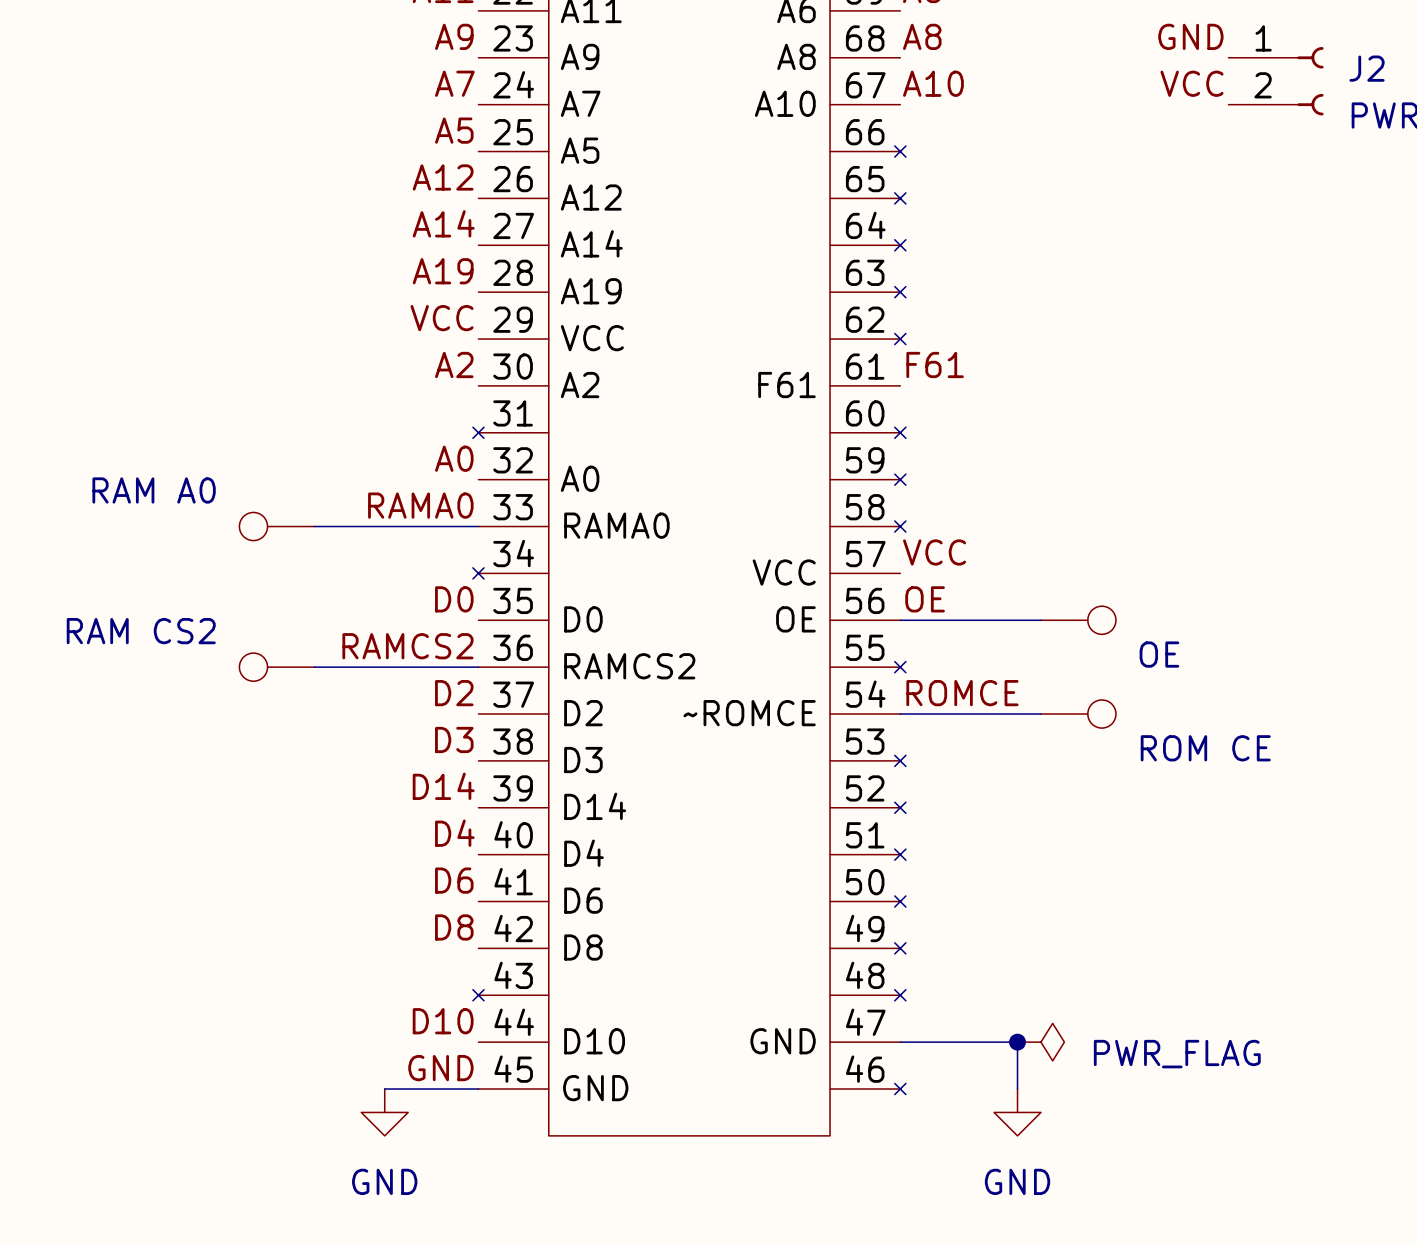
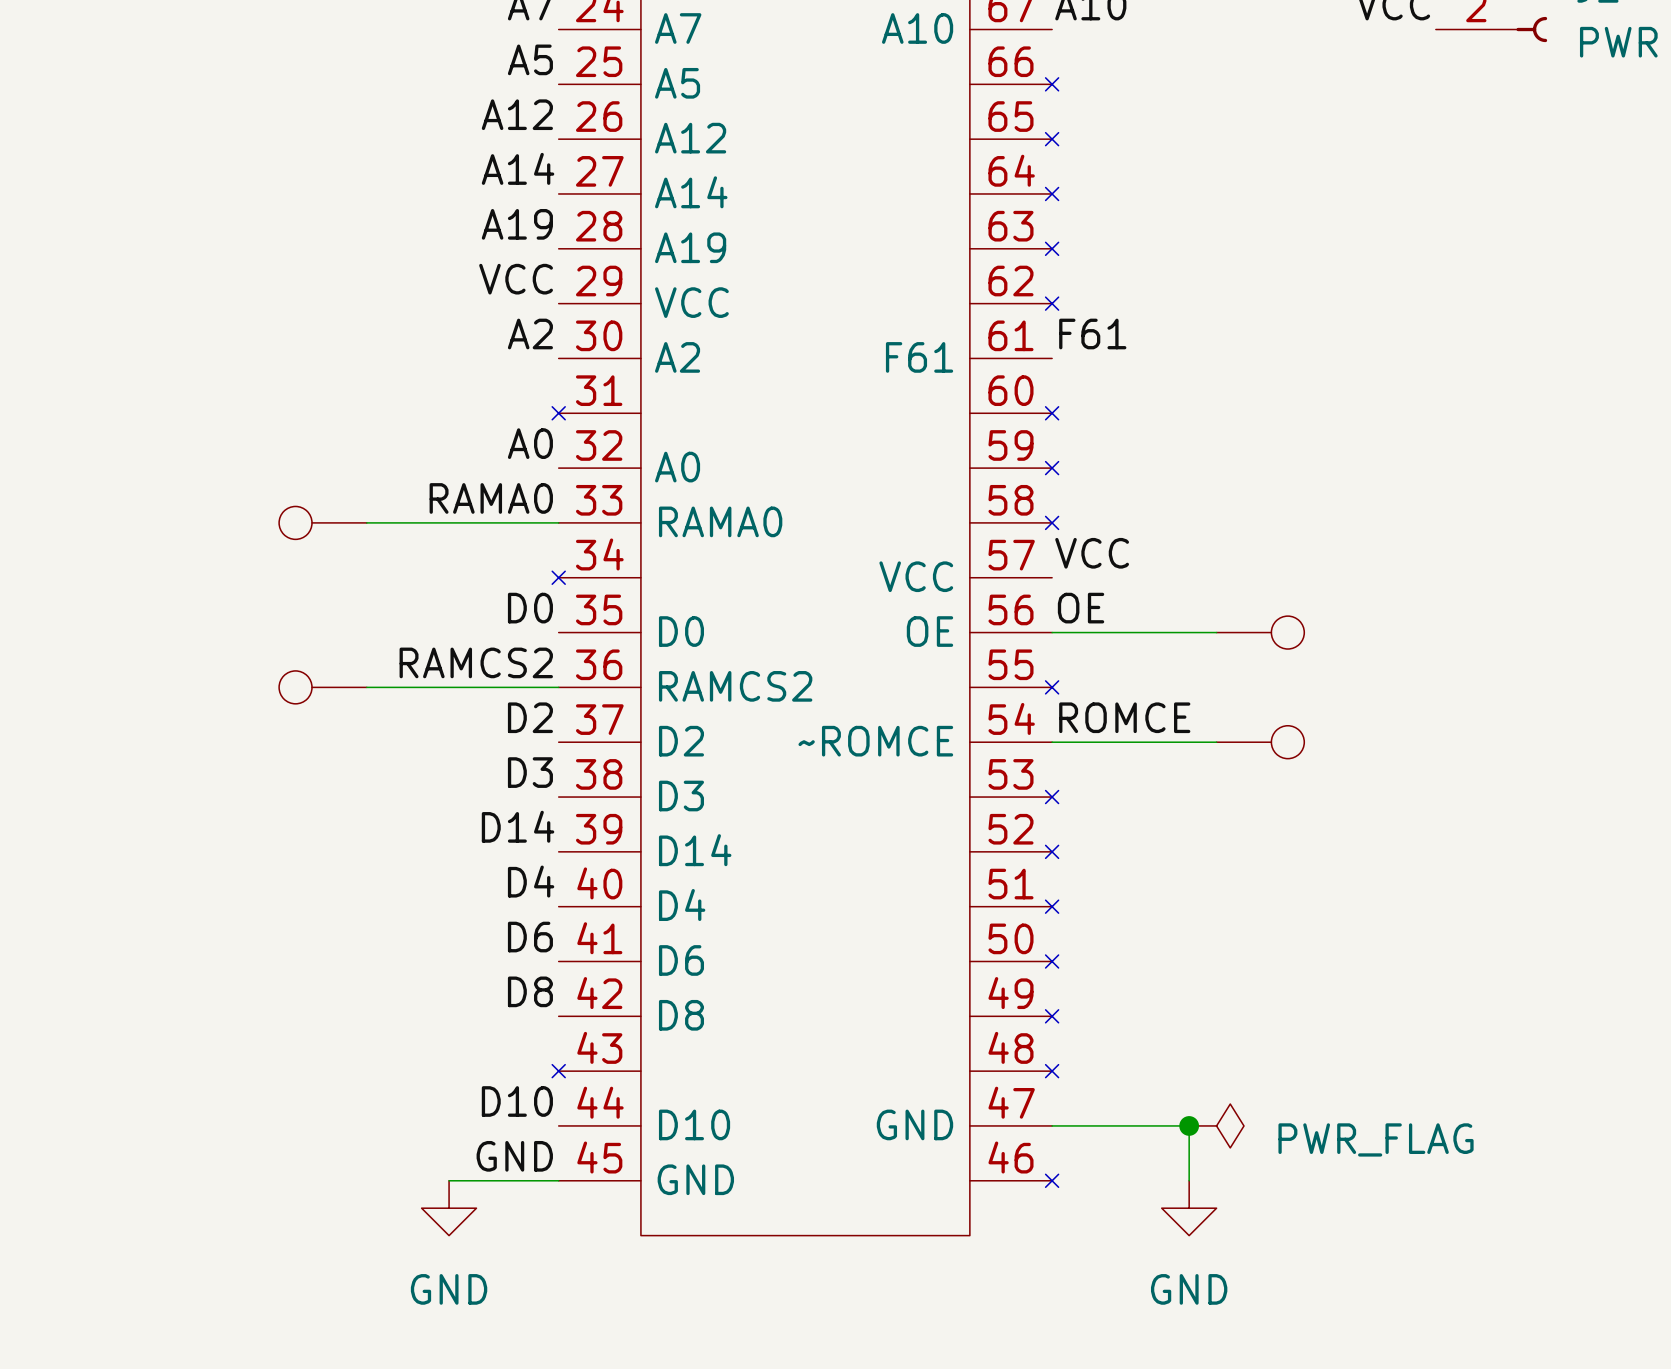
part value: RAM A0 (154, 490) -> none
part value: RAM CS2 (141, 631) -> none
part value: OE (1159, 654) -> none
part value: ROM CE (1205, 748) -> none

